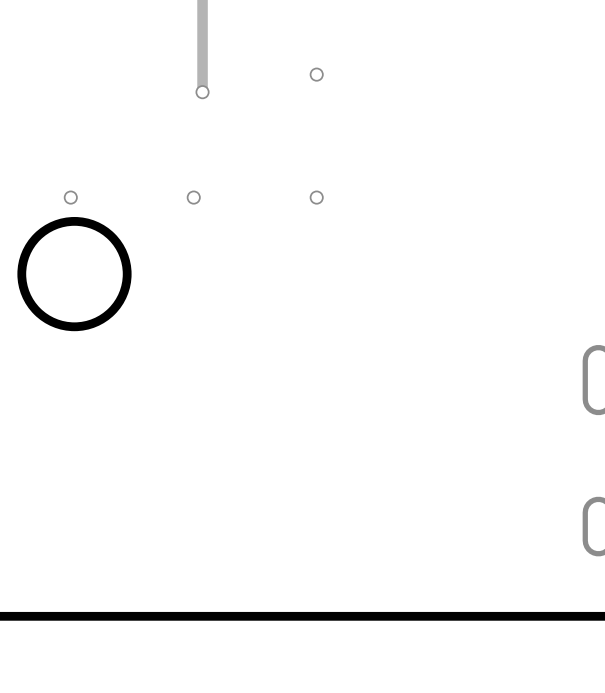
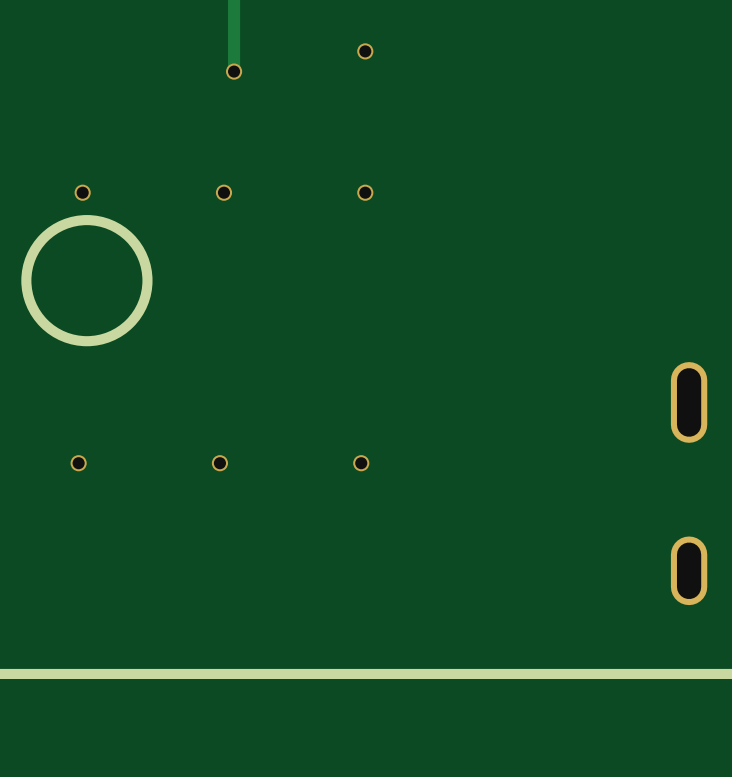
via: none -> (78, 463)
via: none -> (219, 463)
via: none -> (361, 463)

